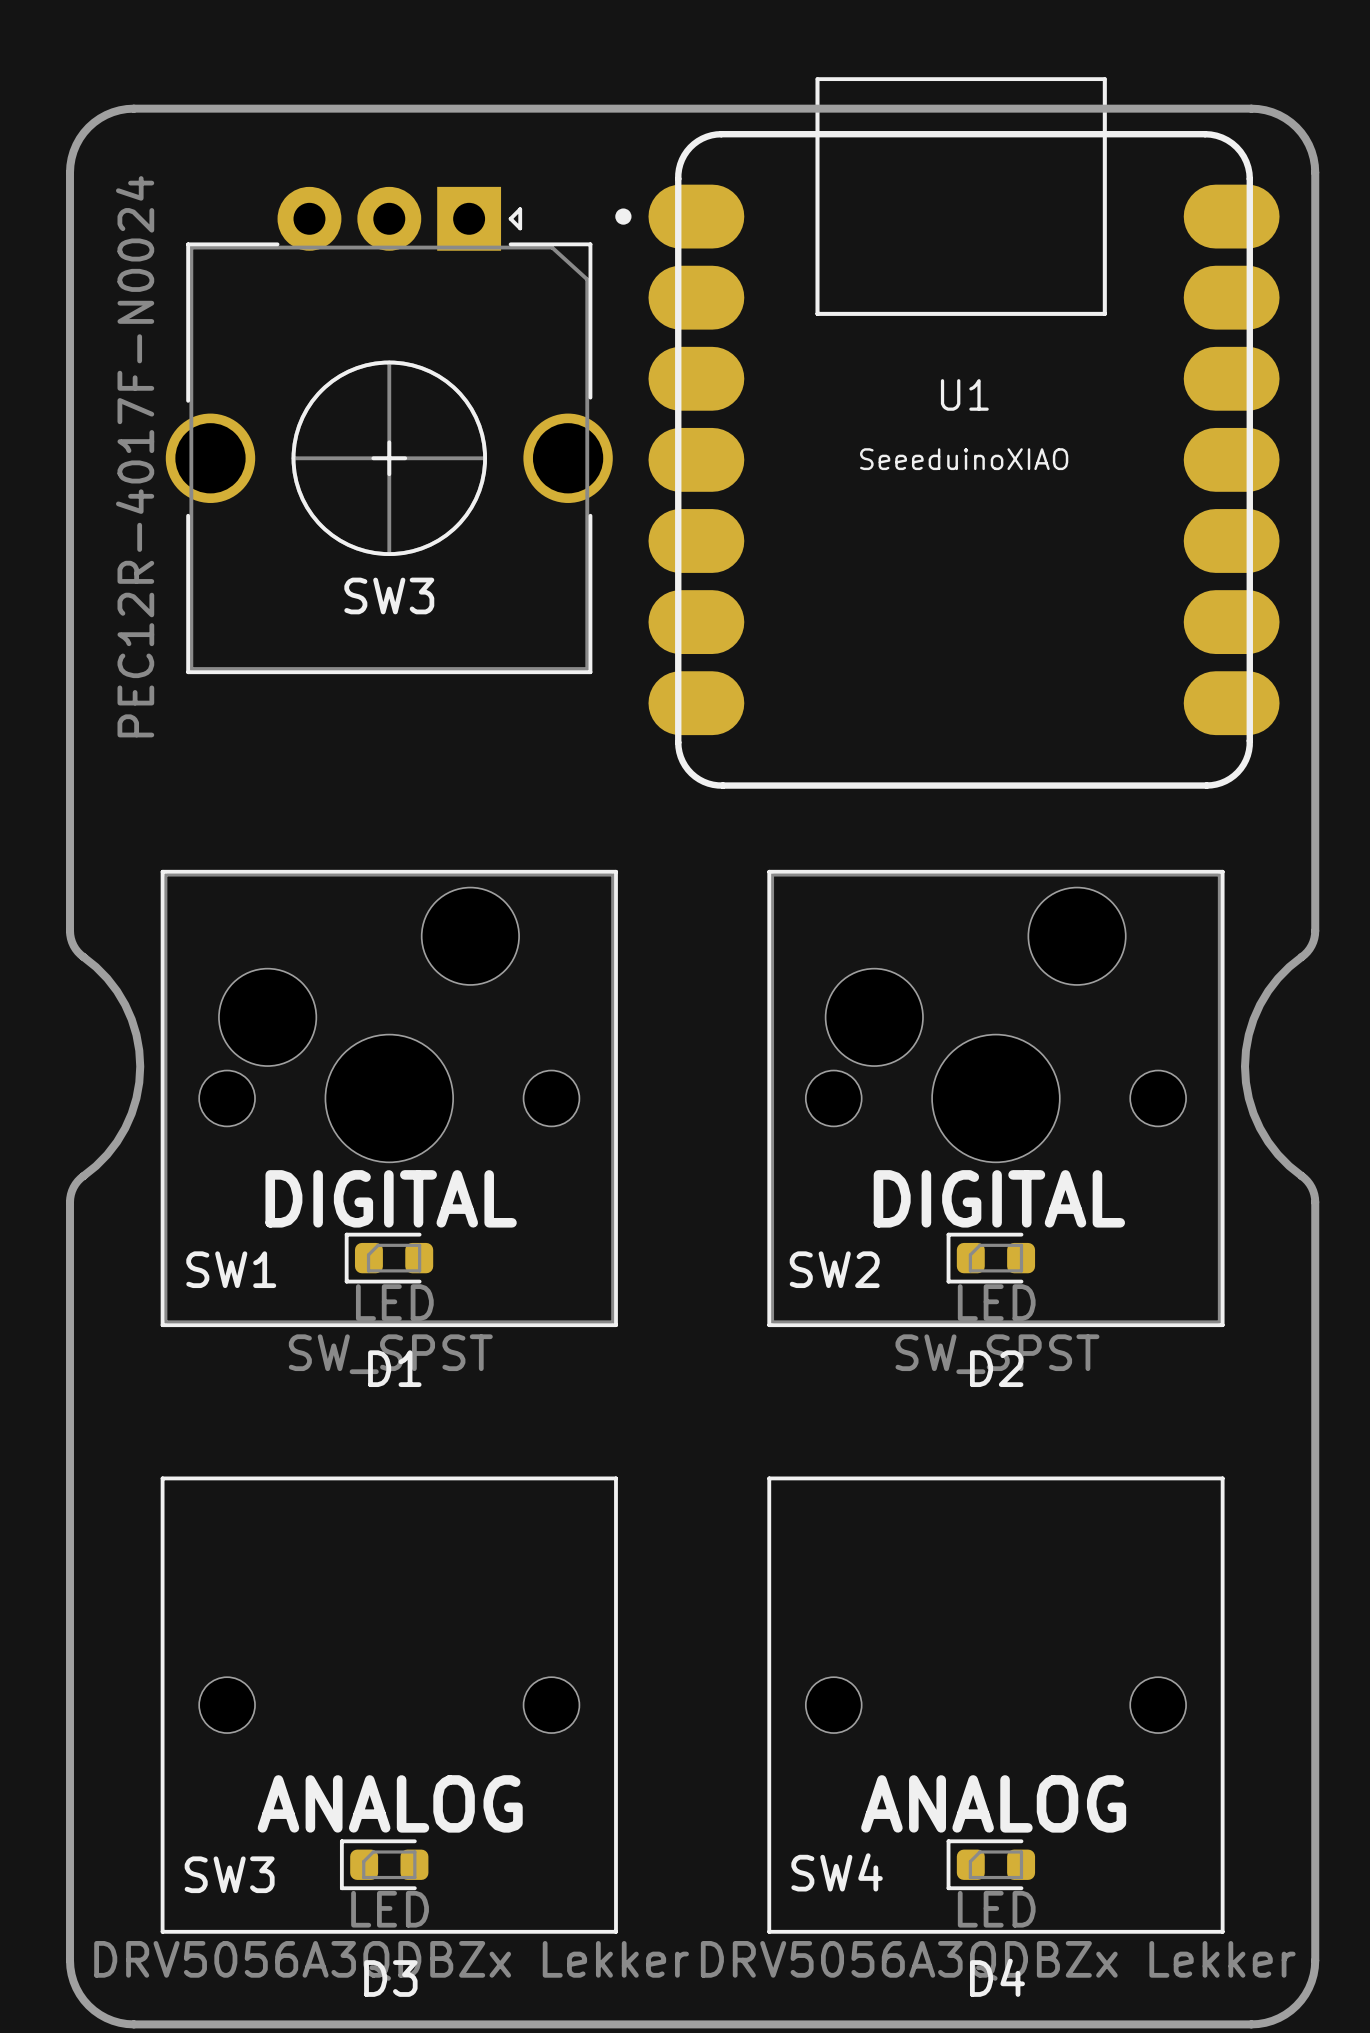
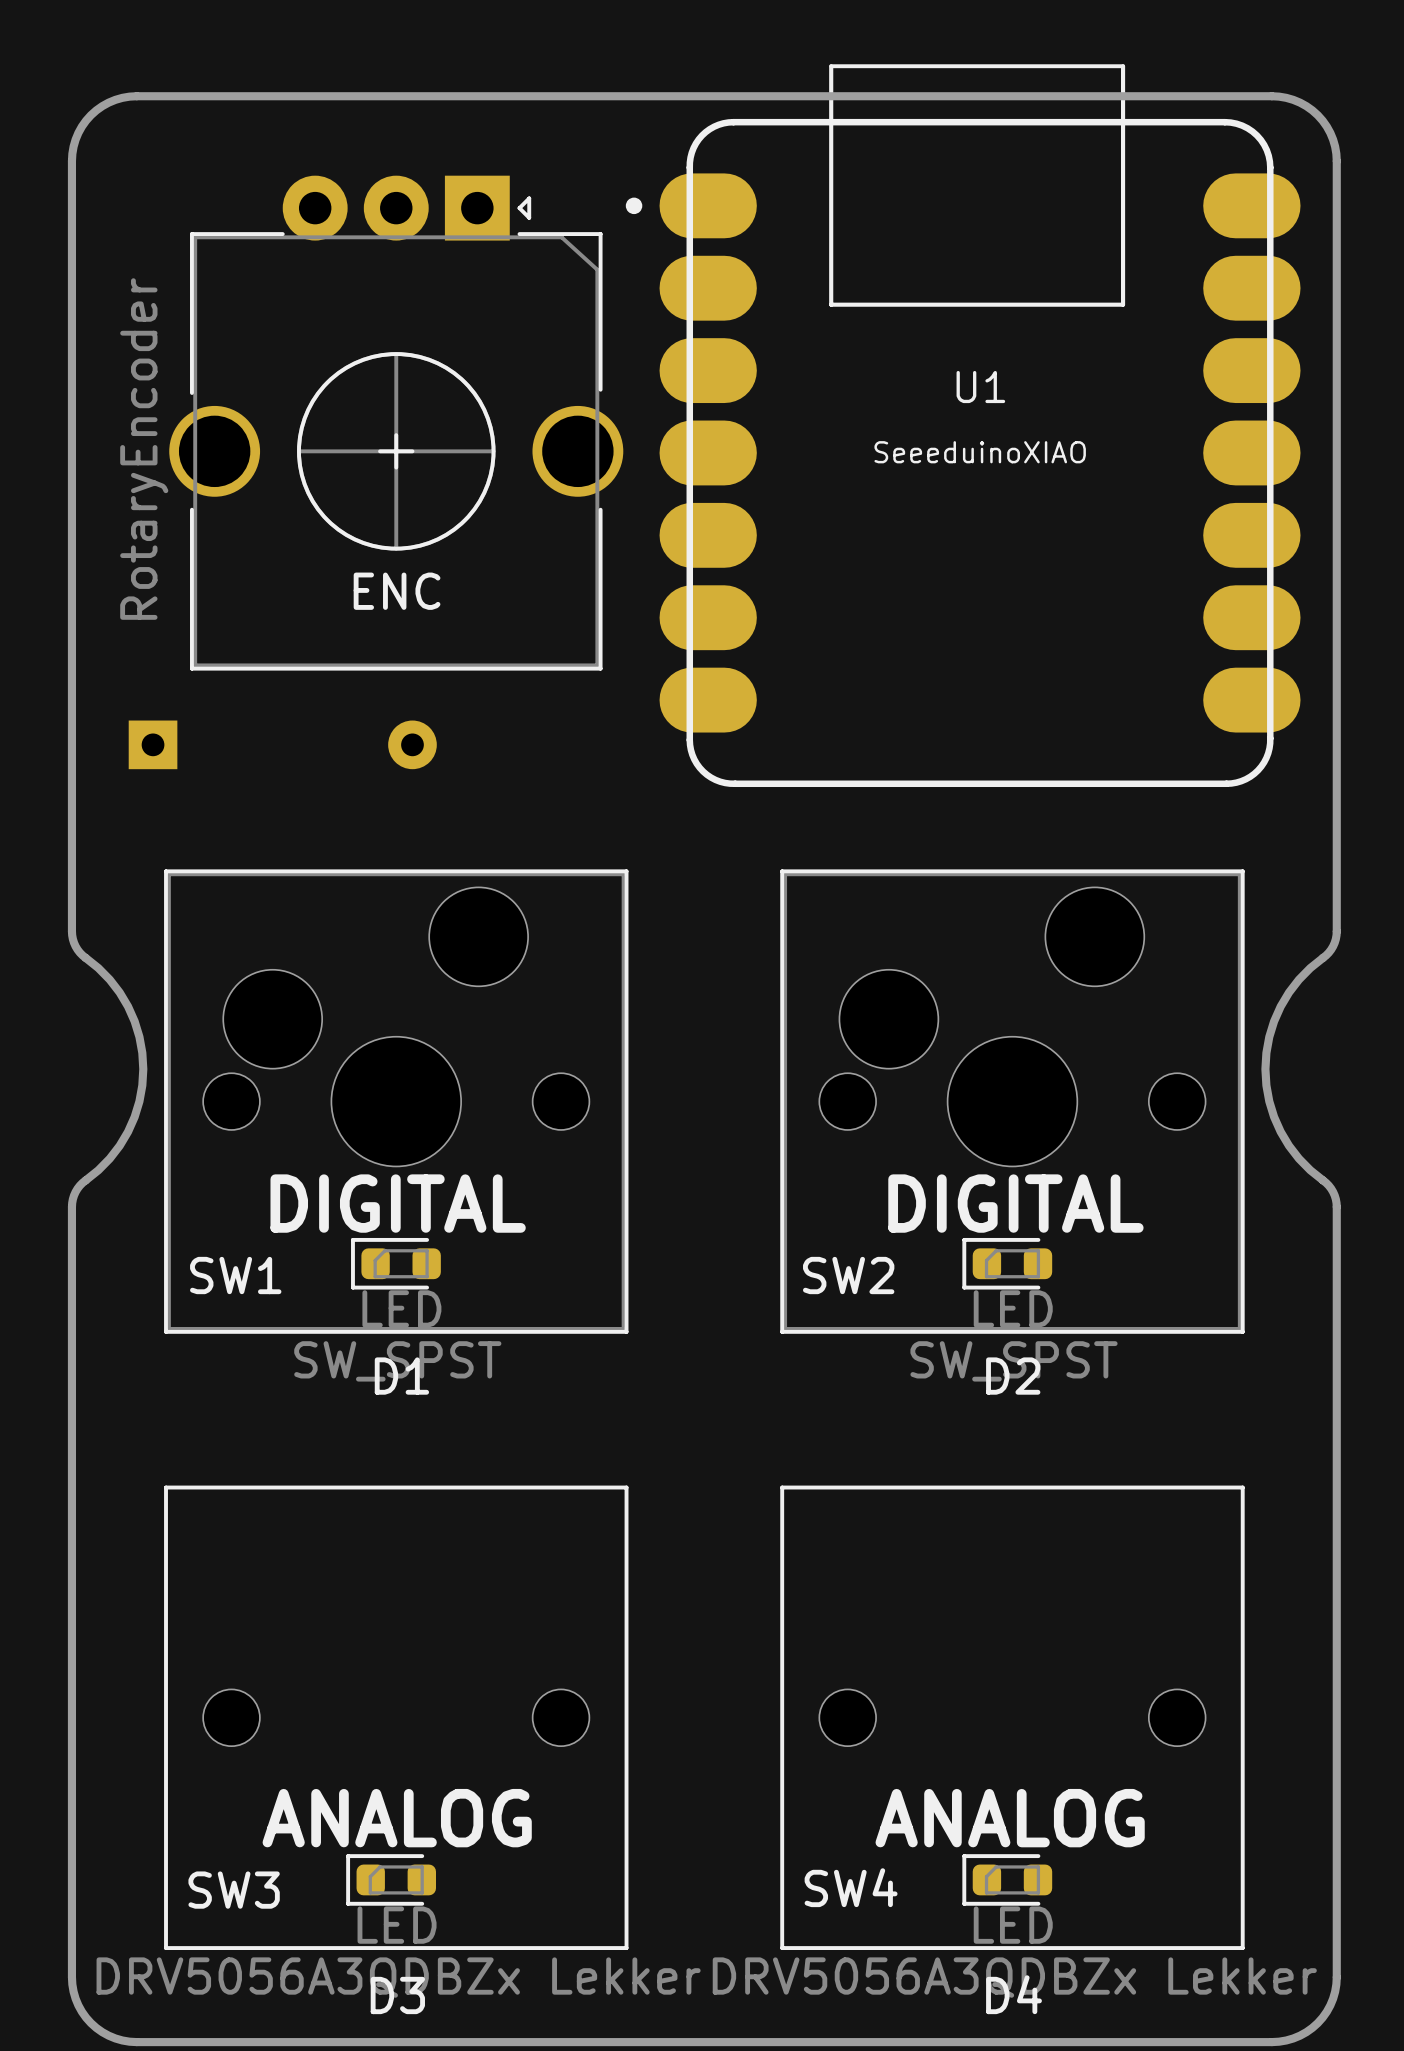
SW3 value: PEC12R-4017F-N0024 (135, 456) -> RotaryEncoder (144, 449)
SW3 name: SW3 (389, 595) -> ENC (397, 591)
part: none -> (153, 744)
part: none -> (412, 744)

